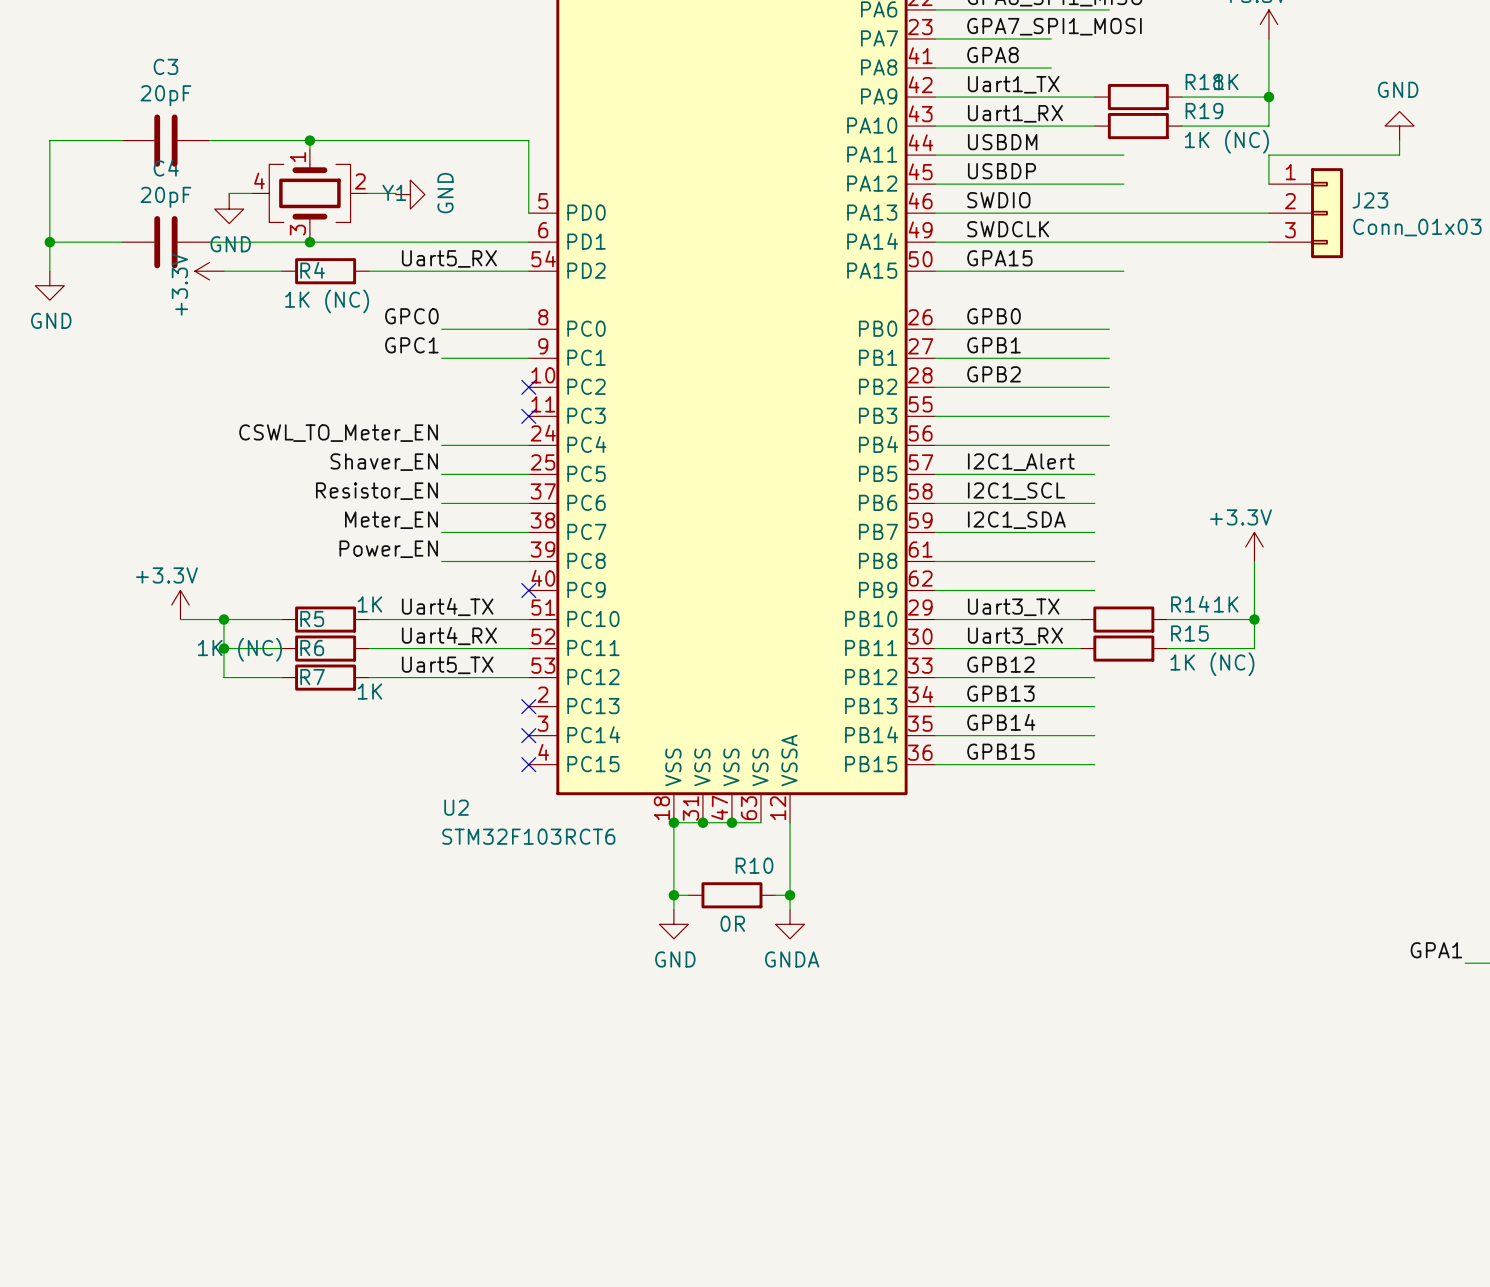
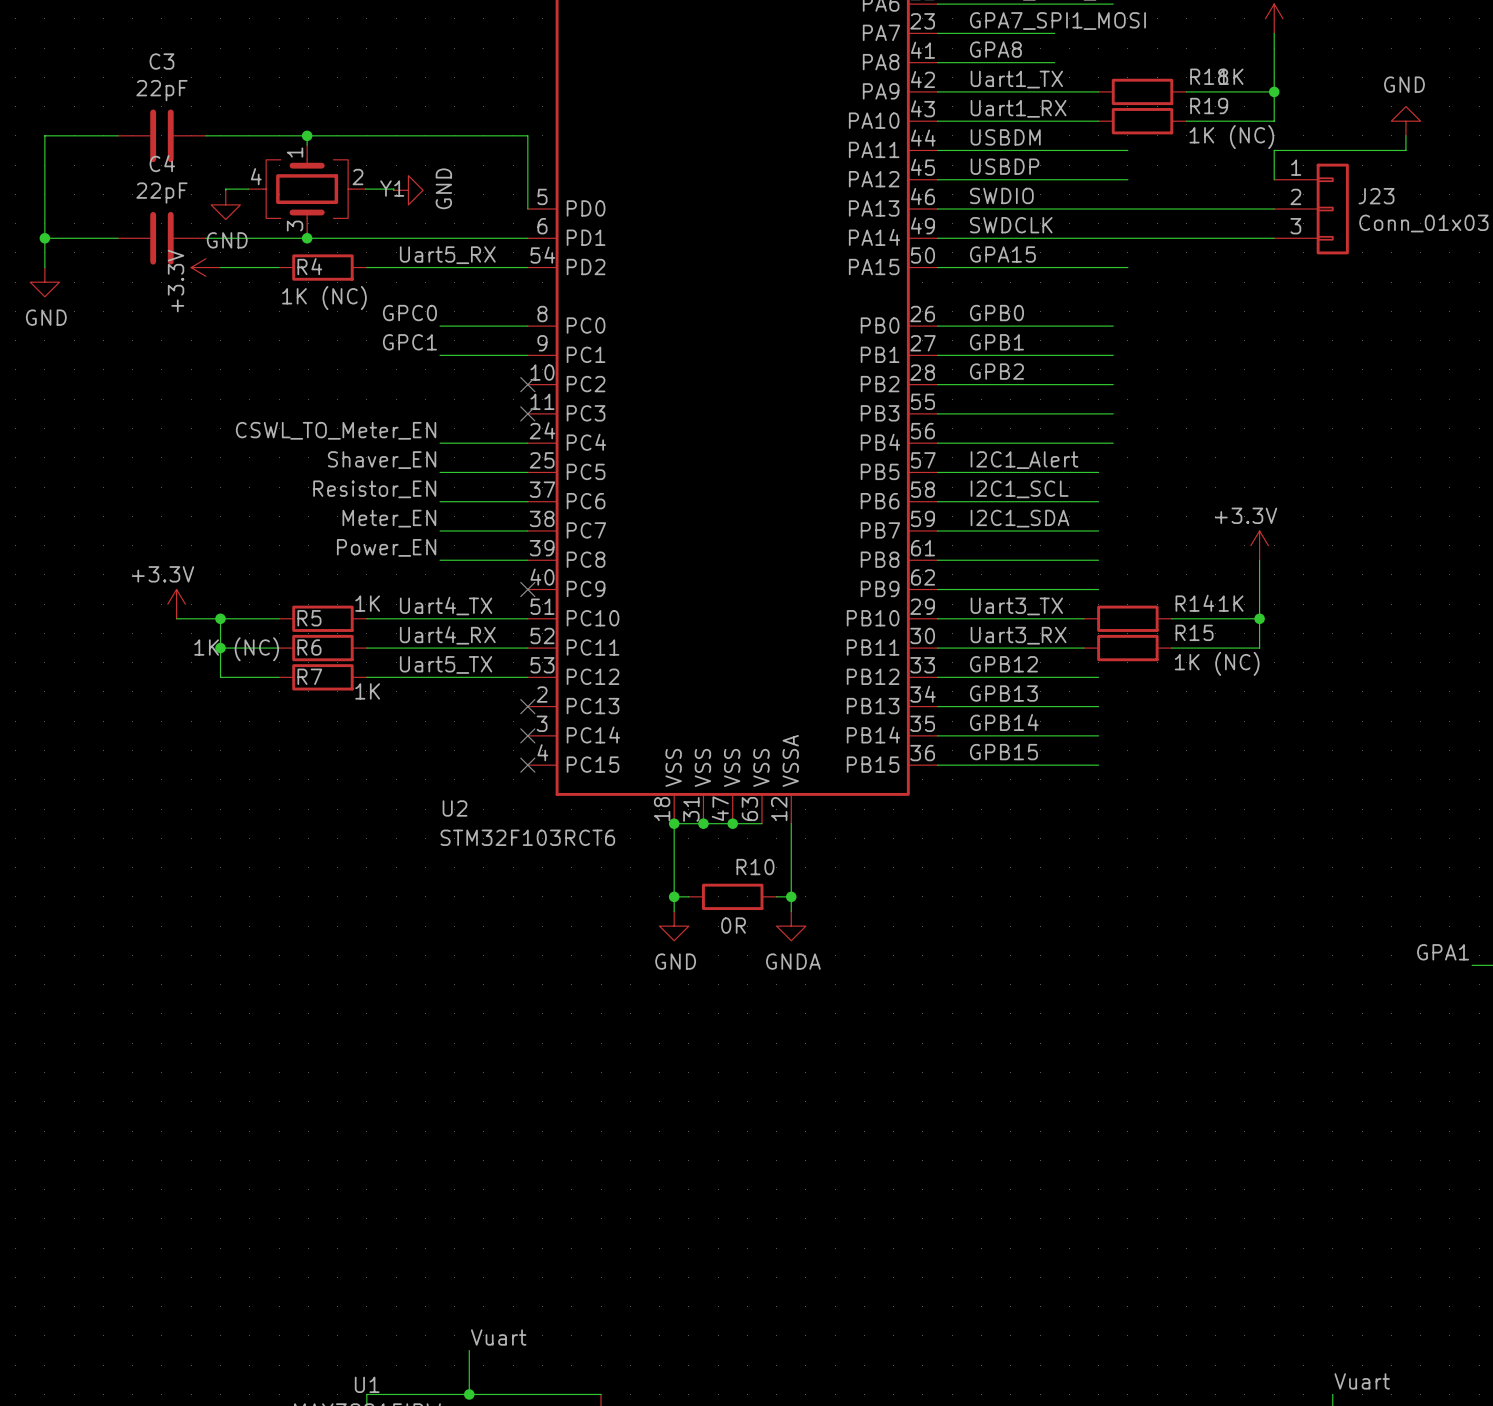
C3 value: 20pF (165, 95) -> 22pF (161, 90)
C4 value: 20pF (165, 197) -> 22pF (161, 193)

